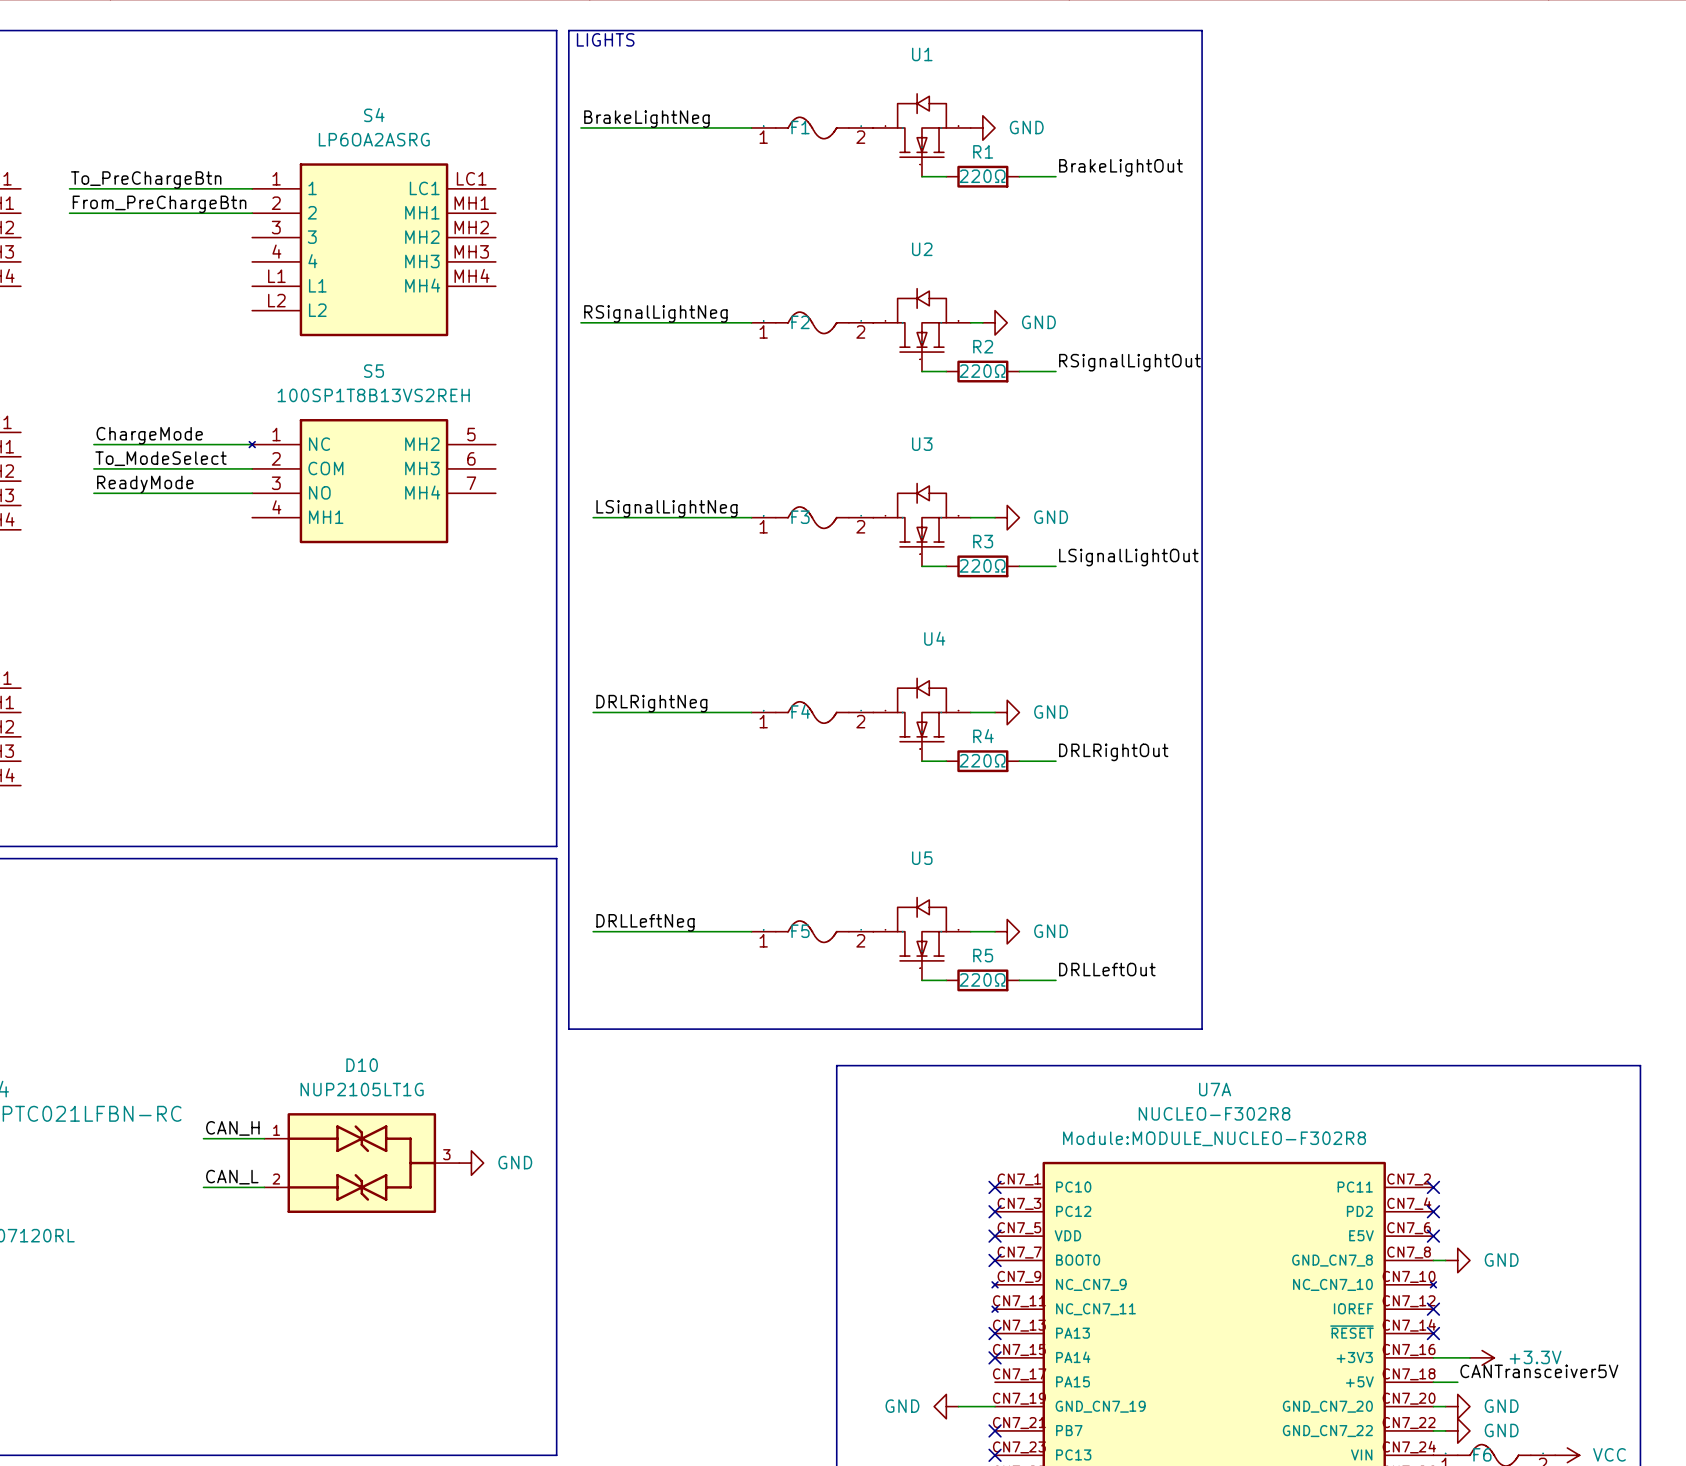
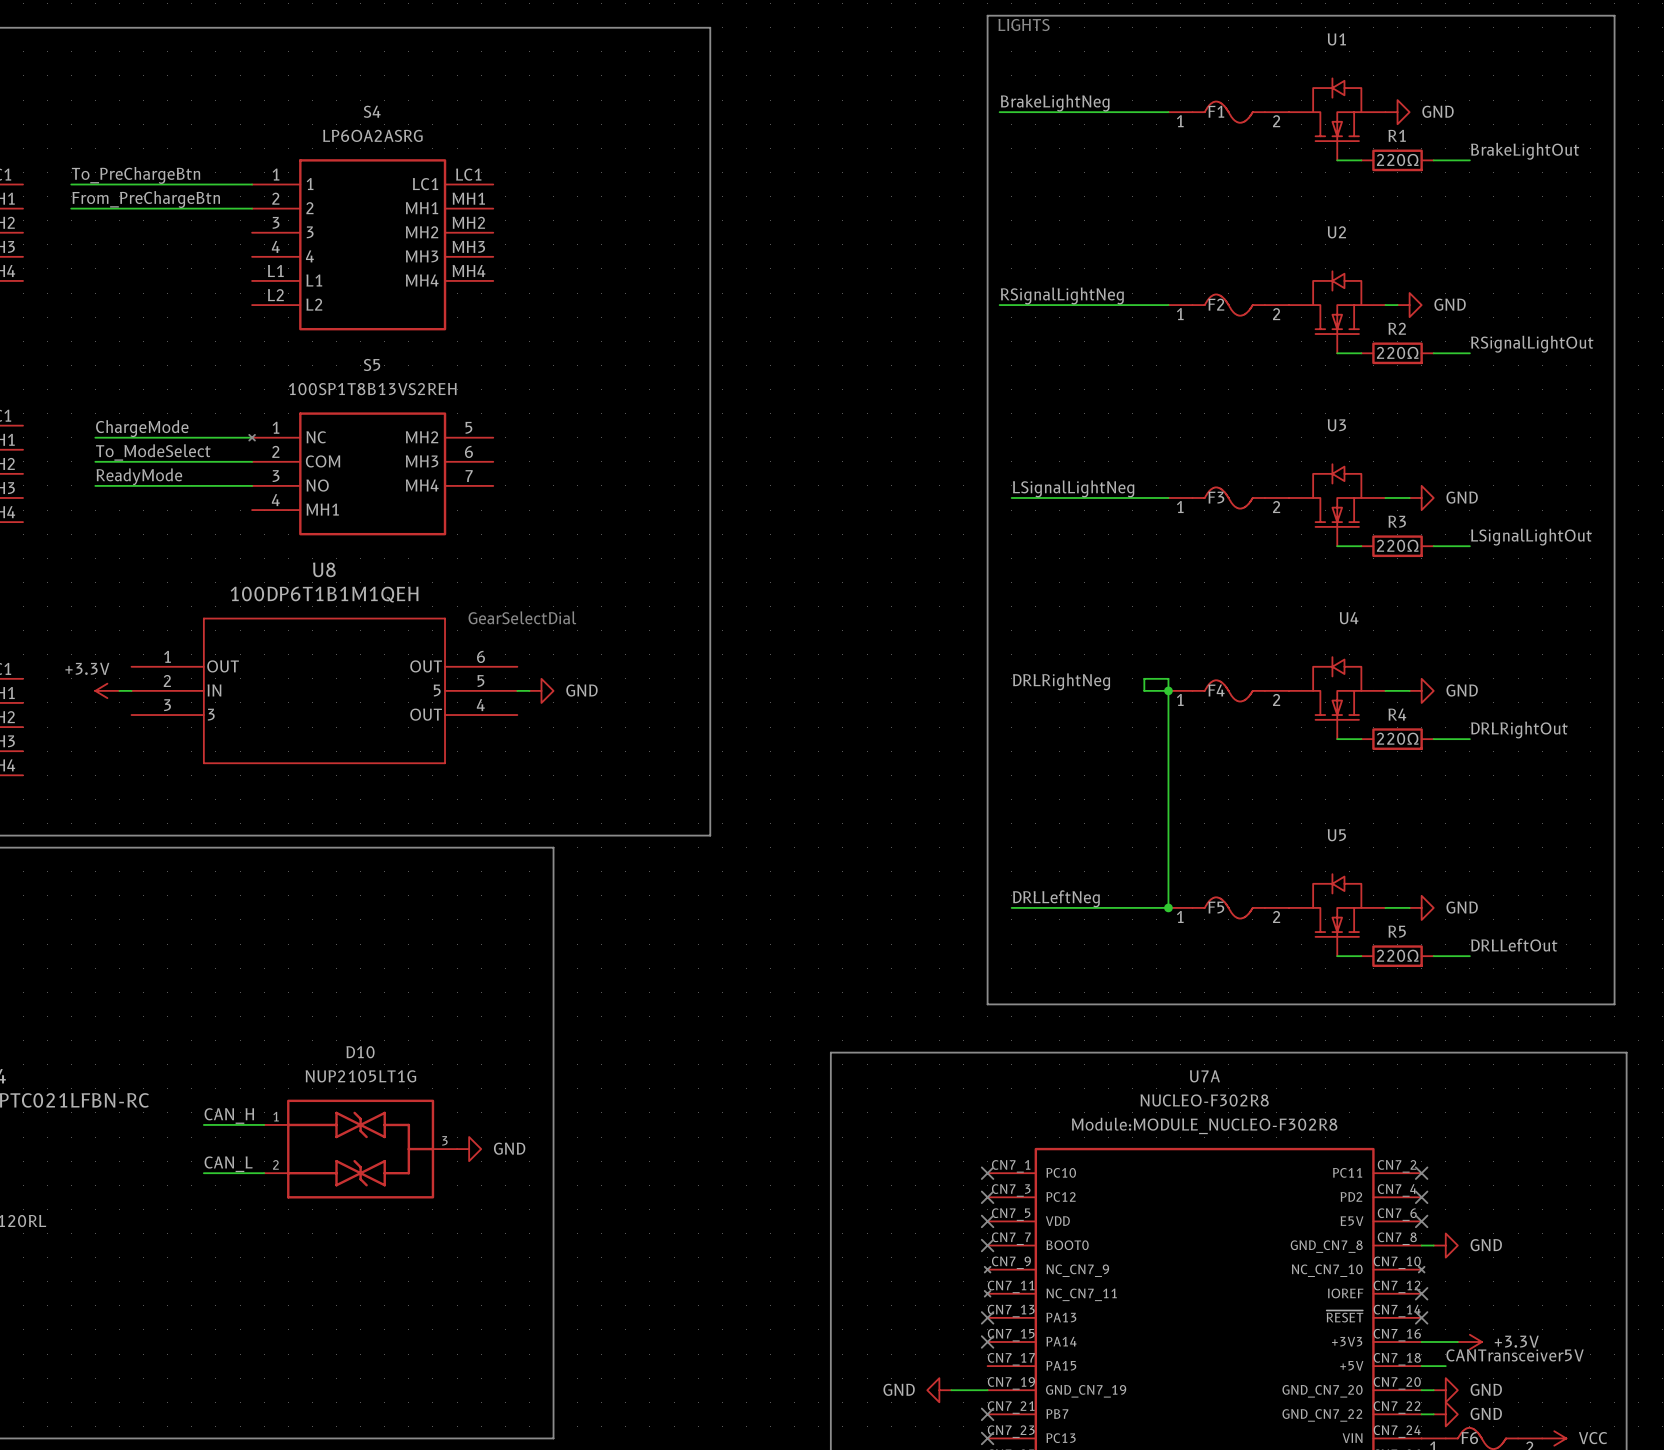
line: none -> (987, 15) (1614, 15) (1614, 1004) (987, 1004) (987, 15)
text: none -> LIGHTS (1024, 25)
line: (556, 30) (556, 846) -> (710, 27) (710, 835) (553, 835)
line: (568, 30) (568, 1029) (1202, 1029) (1202, 30) (714, 30) -> (565, 27) (553, 27)
text: LIGHTS (605, 39) -> none
label: none -> BrakeLightNeg (1055, 103)
wire: none -> (999, 112) (1168, 112)
power symbol: none -> GND (1397, 112)
label: BrakeLightNeg (646, 119) -> none
wire: (581, 127) (751, 127) -> none
F1 position: (812, 127) -> (1228, 112)
power symbol: GND (982, 127) -> none
U1 position: (921, 135) -> (1337, 119)
label: none -> BrakeLightOut (1525, 151)
wire: none -> (1337, 160) (1361, 160)
wire: none -> (1433, 160) (1469, 160)
label: BrakeLightOut (1120, 167) -> none
wire: (921, 176) (946, 176) -> none
R1 position: (982, 176) -> (1397, 160)
wire: (1019, 176) (1055, 176) -> none
label: none -> RSignalLightNeg (1062, 295)
wire: none -> (999, 305) (1168, 305)
wire: none -> (1385, 305) (1397, 305)
power symbol: none -> GND (1409, 305)
label: RSignalLightNeg (655, 313) -> none
wire: (581, 322) (751, 322) -> none
F2 position: (812, 322) -> (1228, 305)
wire: (970, 322) (982, 322) -> none
power symbol: GND (995, 322) -> none
U2 position: (921, 330) -> (1337, 312)
label: none -> RSignalLightOut (1532, 344)
wire: none -> (1337, 353) (1361, 353)
wire: none -> (1433, 353) (1469, 353)
label: RSignalLightOut (1129, 362) -> none
wire: (921, 371) (946, 371) -> none
R2 position: (982, 371) -> (1397, 353)
wire: (1019, 371) (1055, 371) -> none
label: none -> LSignalLightNeg (1073, 488)
wire: none -> (1011, 497) (1168, 497)
wire: none -> (1385, 497) (1409, 497)
power symbol: none -> GND (1421, 497)
label: LSignalLightNeg (666, 508) -> none
wire: (593, 517) (751, 517) -> none
F3 position: (812, 517) -> (1228, 497)
wire: (970, 517) (995, 517) -> none
power symbol: GND (1007, 517) -> none
U3 position: (921, 524) -> (1337, 505)
label: none -> LSignalLightOut (1531, 537)
wire: none -> (1337, 546) (1361, 546)
wire: none -> (1433, 546) (1469, 546)
label: LSignalLightOut (1128, 557) -> none
wire: (921, 566) (946, 566) -> none
R3 position: (982, 566) -> (1397, 546)
wire: (1019, 566) (1055, 566) -> none
text: none -> GearSelectDial (522, 617)
label: none -> DRLRightNeg (1061, 681)
power symbol: none -> +3.3V (107, 690)
wire: none -> (119, 690) (131, 690)
U8: none -> 100DP6T1B1M1QEH (324, 690)
wire: none -> (517, 690) (529, 690)
power symbol: none -> GND (541, 690)
wire: none -> (1168, 690) (1144, 690) (1144, 678) (1168, 678) (1168, 907) (1011, 907)
junction: none -> (1168, 690)
wire: none -> (1385, 690) (1409, 690)
power symbol: none -> GND (1421, 690)
label: DRLRightNeg (651, 703) -> none
wire: (593, 712) (751, 712) -> none
F4 position: (812, 712) -> (1228, 690)
wire: (970, 712) (995, 712) -> none
power symbol: GND (1007, 712) -> none
U4 position: (921, 719) -> (1337, 698)
label: none -> DRLRightOut (1519, 730)
wire: none -> (1337, 739) (1361, 739)
wire: none -> (1433, 739) (1469, 739)
label: DRLRightOut (1113, 752) -> none
wire: (921, 761) (946, 761) -> none
R4 position: (982, 761) -> (1397, 739)
wire: (1019, 761) (1055, 761) -> none
label: none -> DRLLeftNeg (1056, 898)
junction: none -> (1168, 907)
wire: none -> (1385, 907) (1409, 907)
power symbol: none -> GND (1421, 907)
label: DRLLeftNeg (645, 922) -> none
wire: (593, 931) (751, 931) -> none
F5 position: (812, 931) -> (1228, 907)
wire: (970, 931) (995, 931) -> none
power symbol: GND (1007, 931) -> none
U5 position: (921, 938) -> (1337, 915)
label: none -> DRLLeftOut (1514, 945)
wire: none -> (1337, 956) (1361, 956)
wire: none -> (1433, 956) (1469, 956)
label: DRLLeftOut (1107, 969) -> none
wire: (921, 980) (946, 980) -> none
R5 position: (982, 980) -> (1397, 956)
wire: (1019, 980) (1055, 980) -> none

